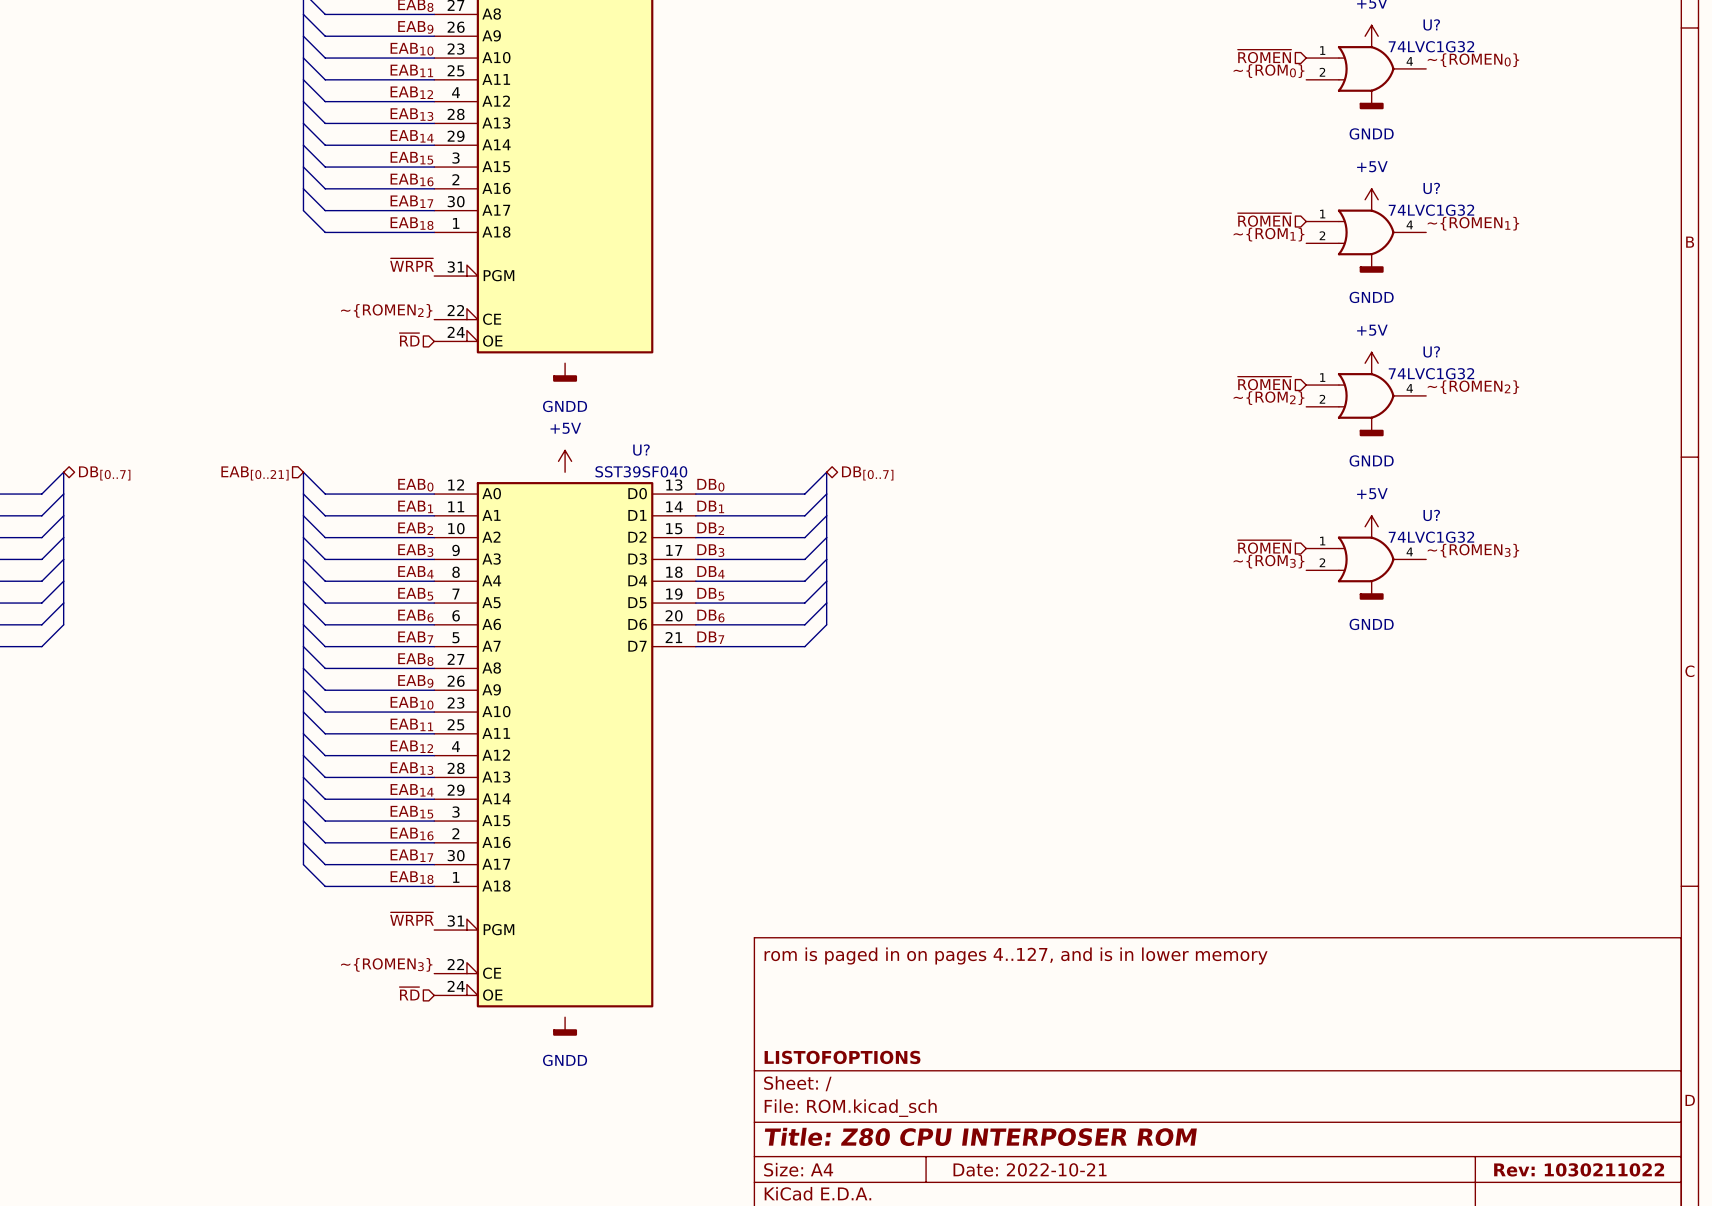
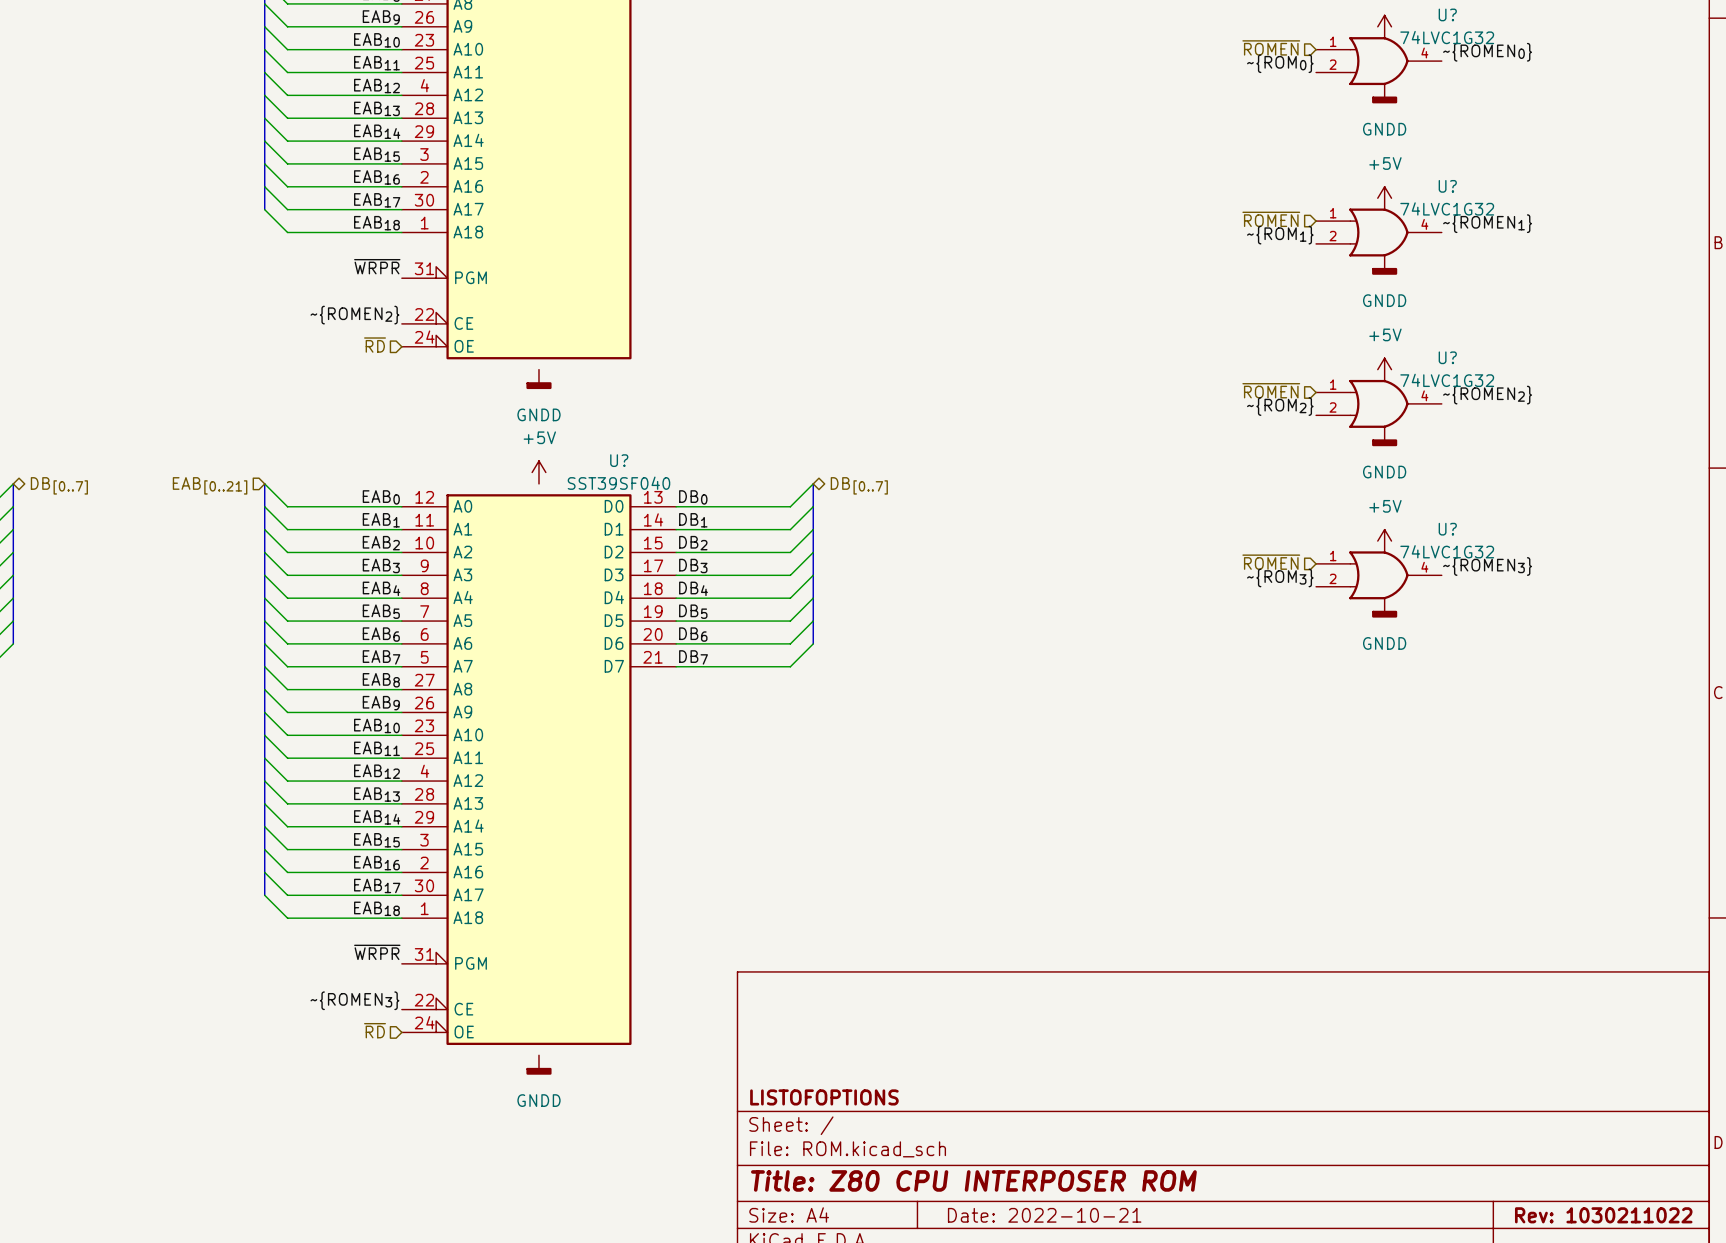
title block: rom is paged in on pages 4..127, and is in lower memory (1016, 956) -> none

